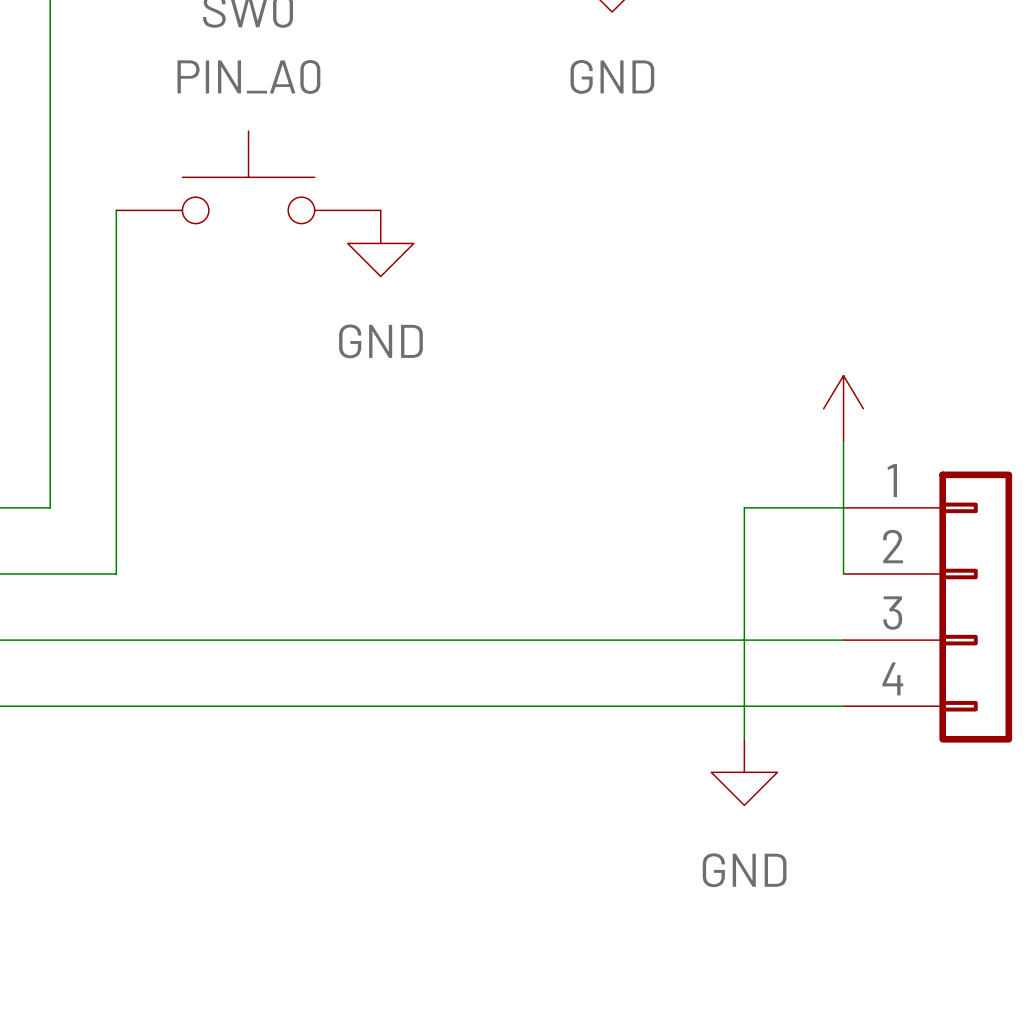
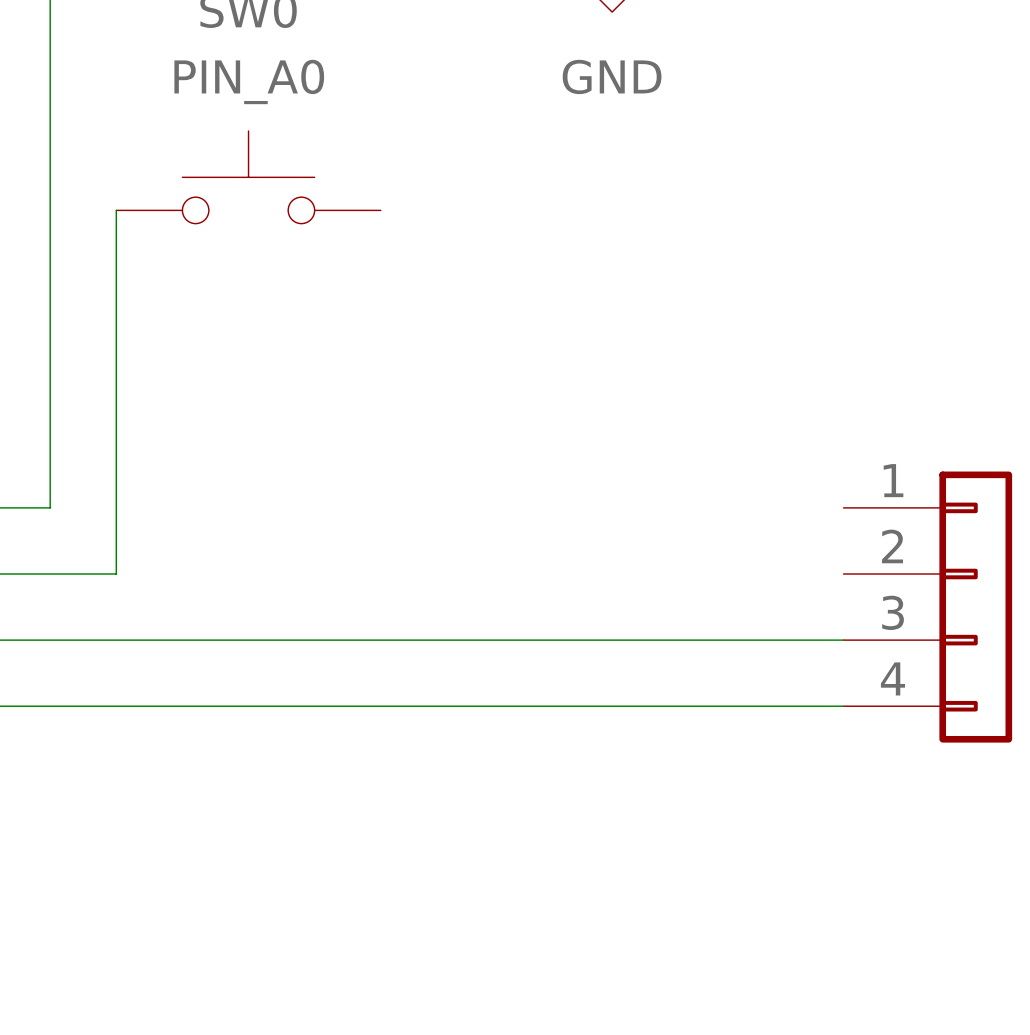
power symbol: GND (380, 243) -> none
power symbol: (843, 408) -> none
wire: (843, 441) (843, 574) -> none
wire: (843, 507) (744, 507) (744, 739) -> none
power symbol: GND (744, 772) -> none

